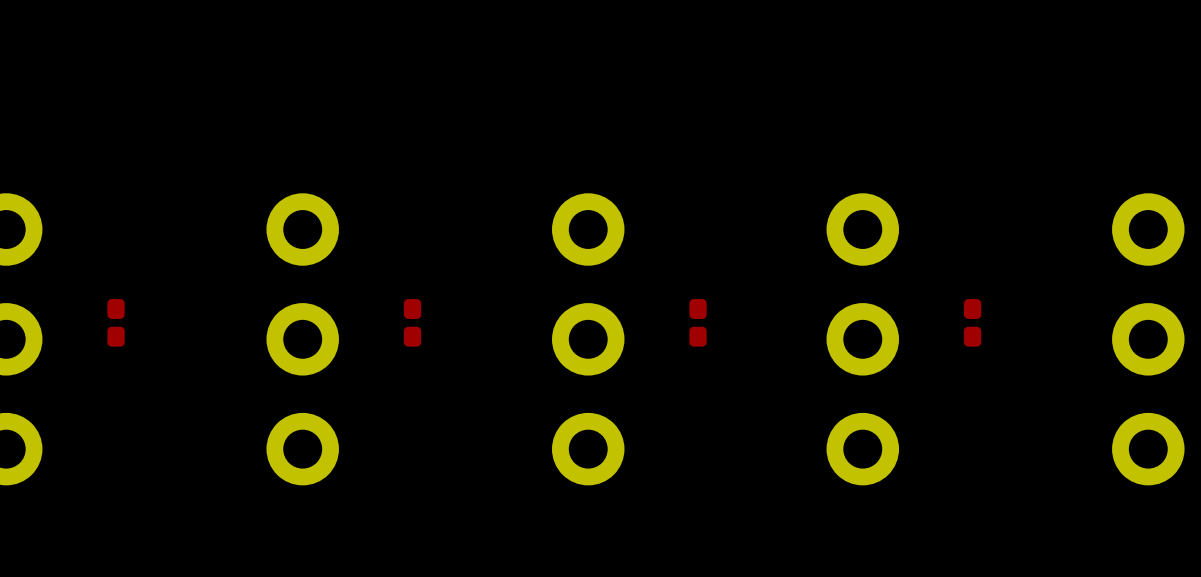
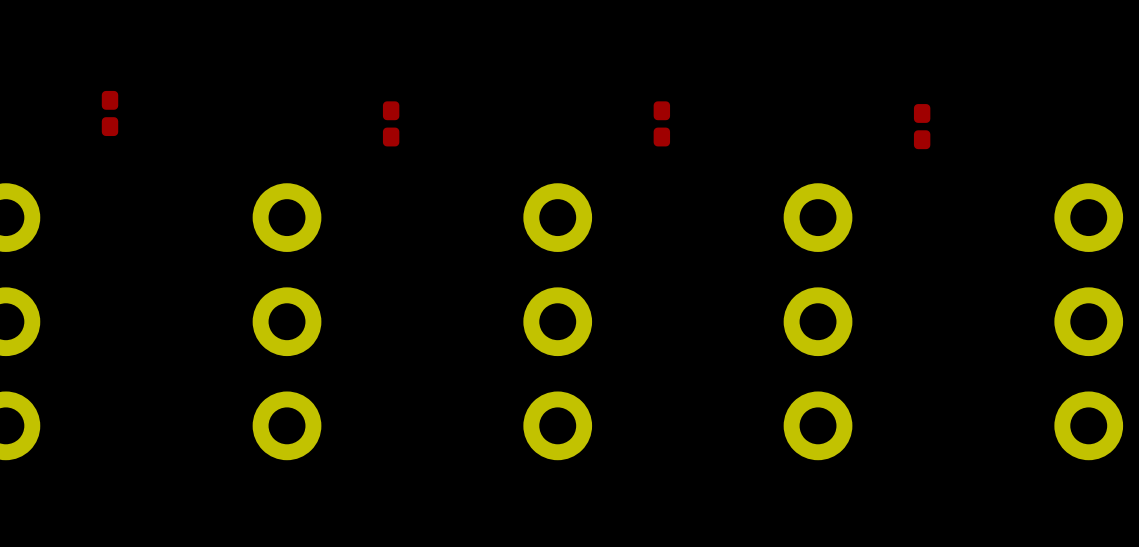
part: none -> (110, 113)
part: none -> (391, 123)
part: none -> (661, 123)
part: none -> (922, 126)
part: (116, 322) -> none
part: (412, 322) -> none
part: (698, 322) -> none
part: (972, 322) -> none

